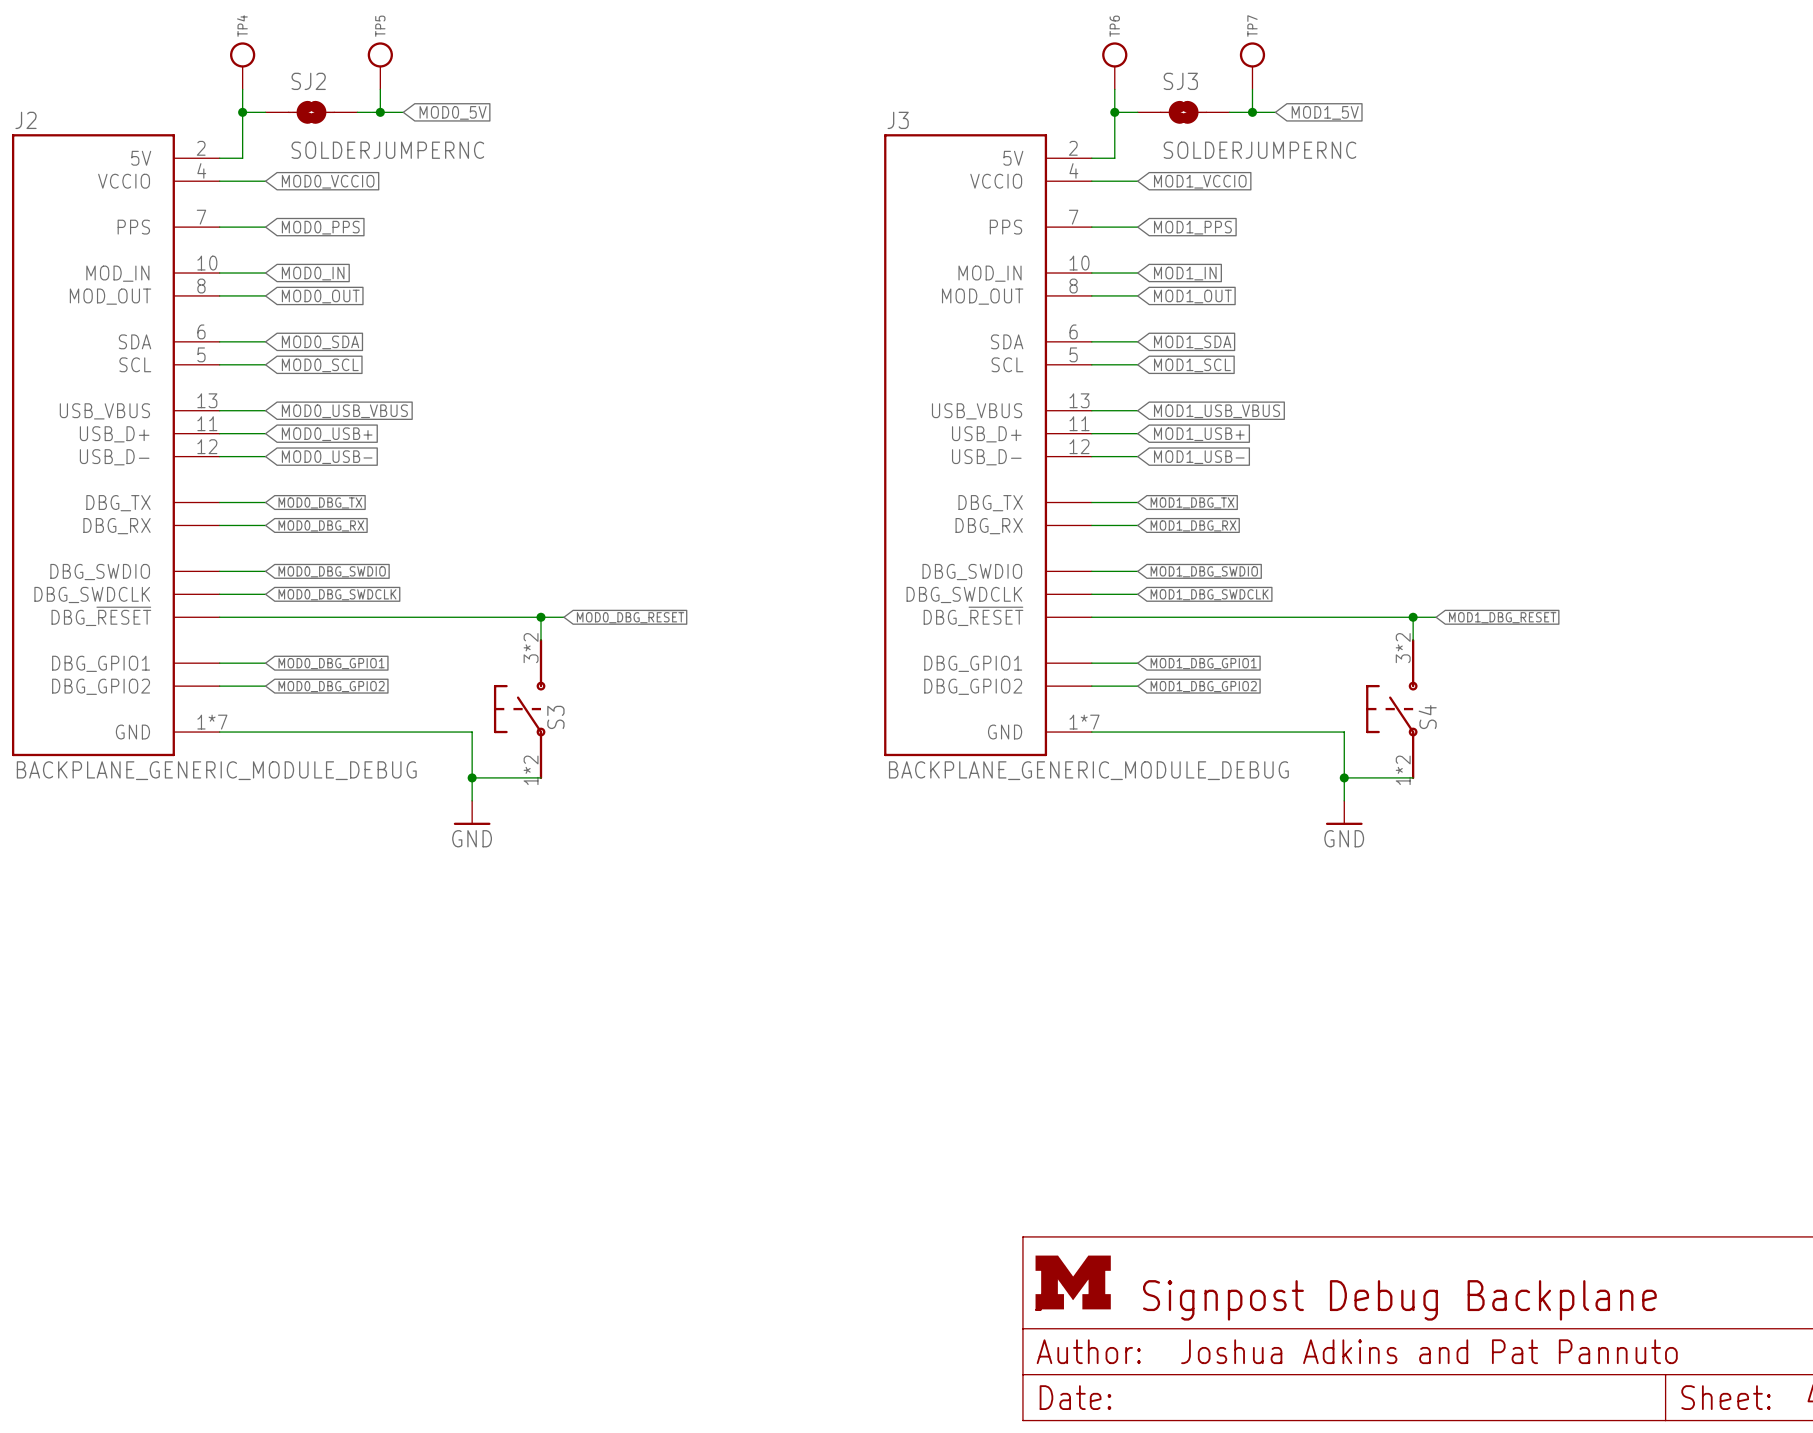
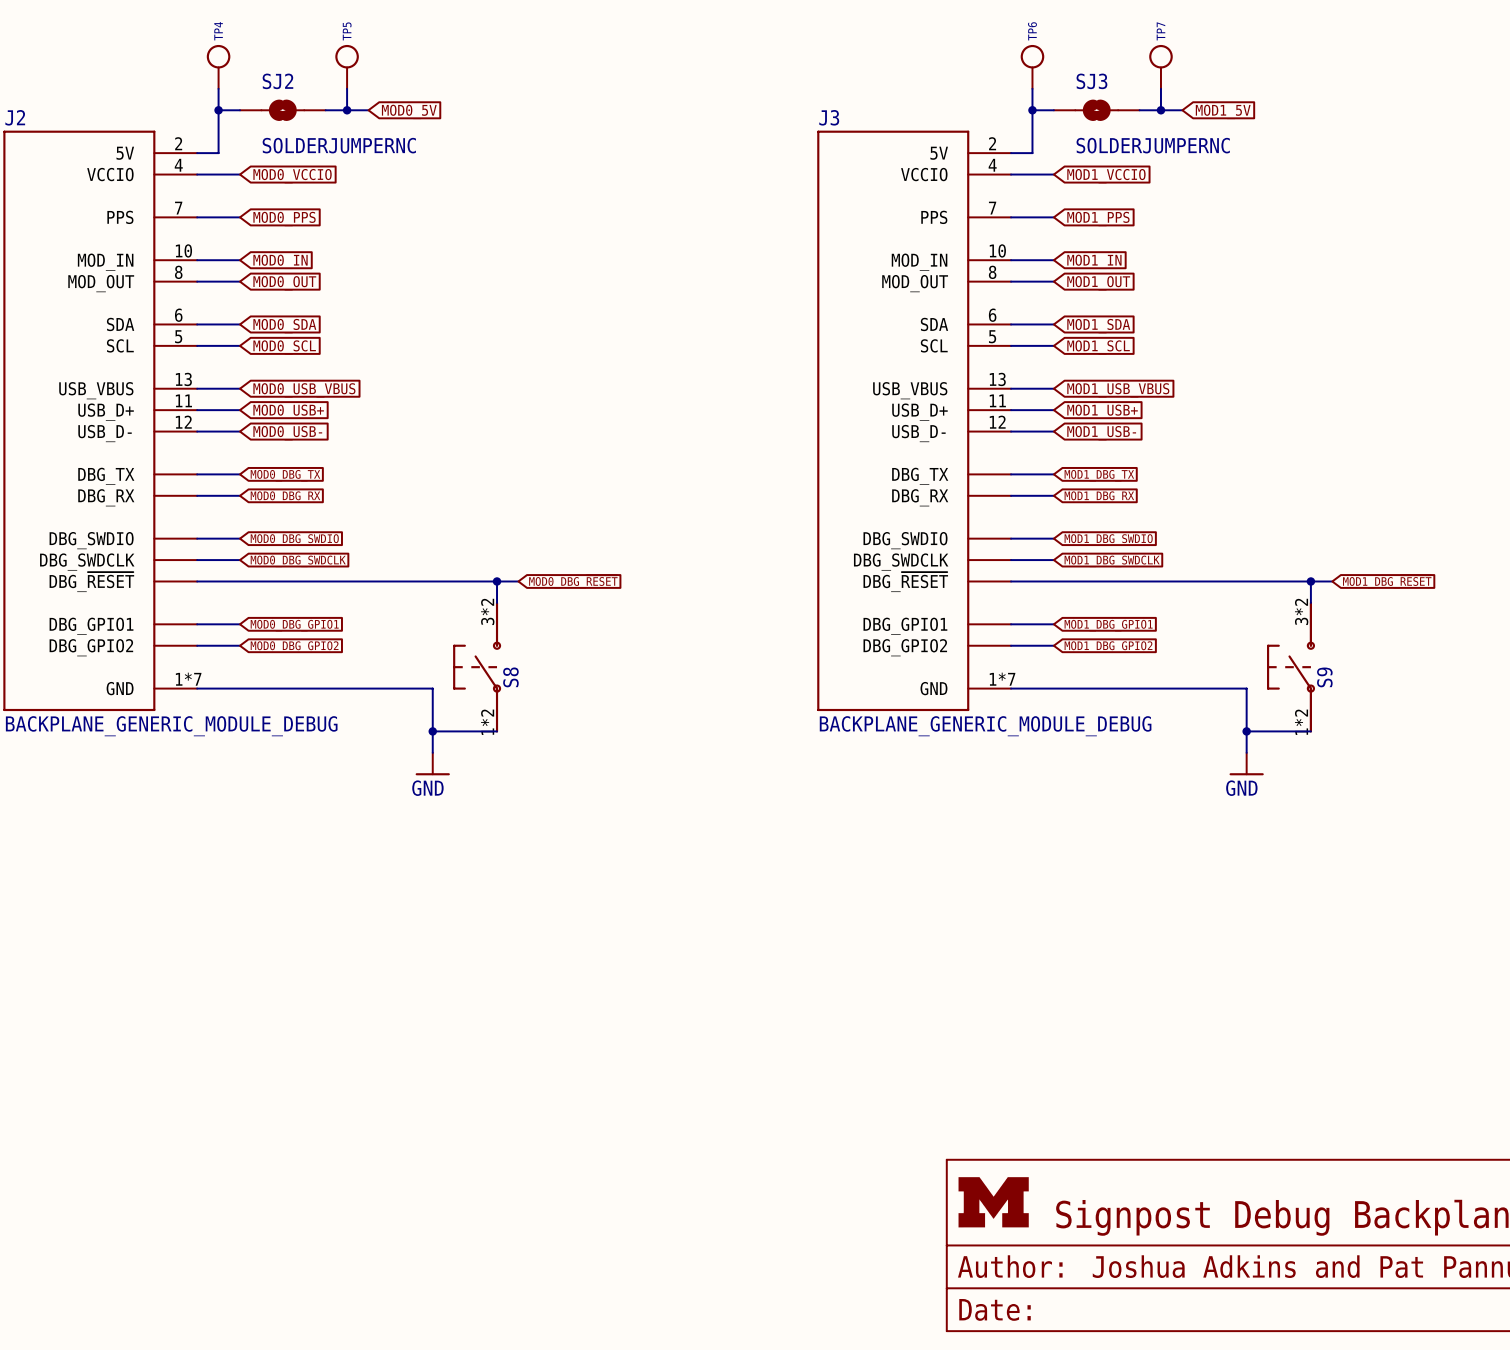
S3 name: S3 (555, 717) -> S8 (510, 677)
S4 name: S4 (1427, 717) -> S9 (1324, 677)

